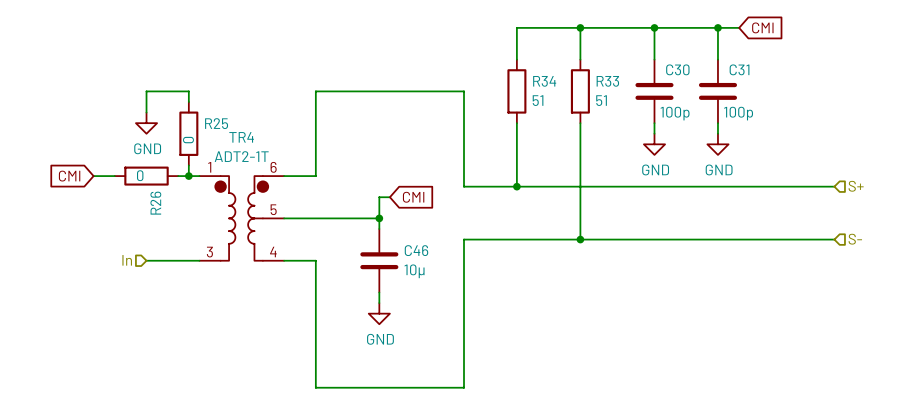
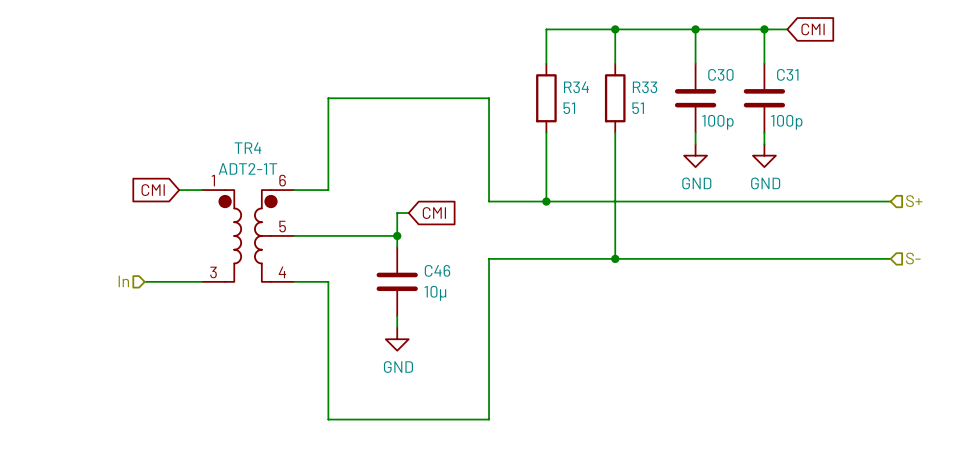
wire: (188, 101) (188, 91) (146, 91) (146, 112) -> none
power symbol: GND (146, 123) -> none
R25: 0 (188, 133) -> none
wire: (188, 165) (188, 176) -> none
global label position: CMI (69, 176) -> CMI (153, 190)
wire: (93, 176) (114, 176) -> none
R26: 0 (146, 176) -> none
junction: (188, 176) -> none

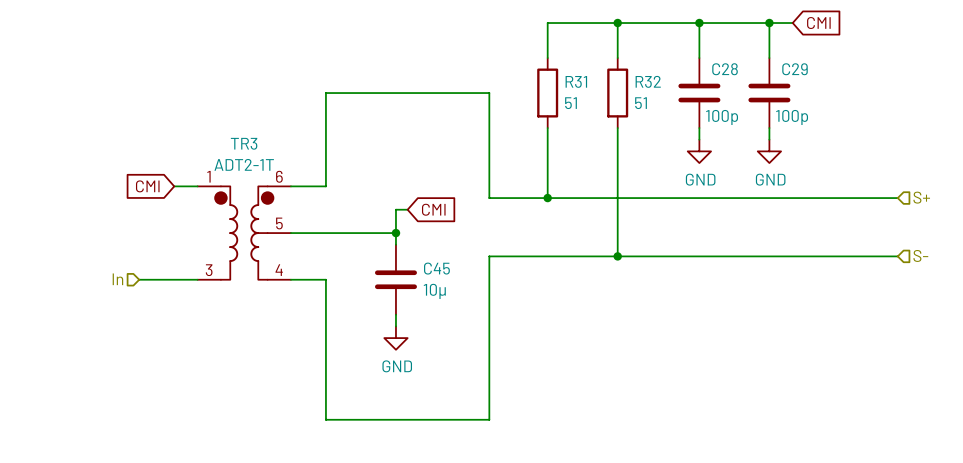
C30 name: C30 (720, 74) -> C28 (725, 69)
C31 name: C31 (787, 74) -> C29 (795, 69)
R34 name: R34 (576, 87) -> R31 (576, 81)
R33 name: R33 (645, 87) -> R32 (648, 81)
TR4 name: TR4 (247, 148) -> TR3 (244, 143)
C46 name: C46 (437, 270) -> C45 (436, 268)

